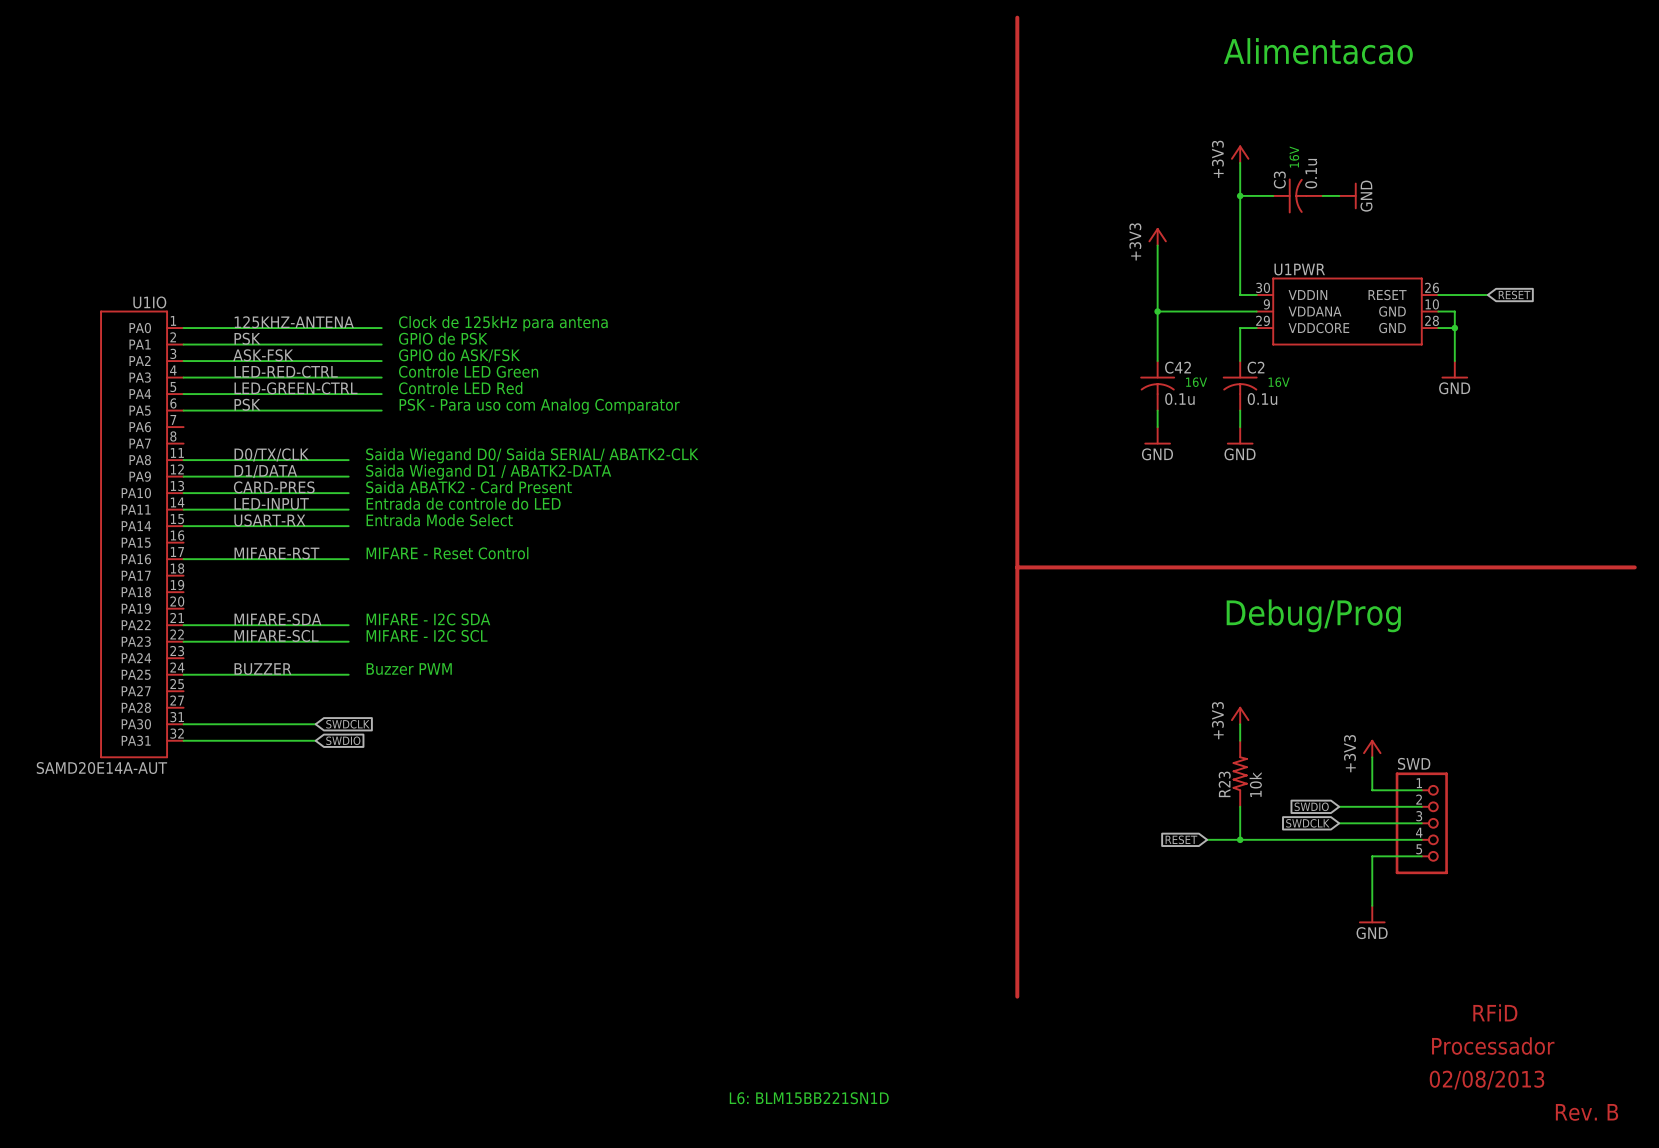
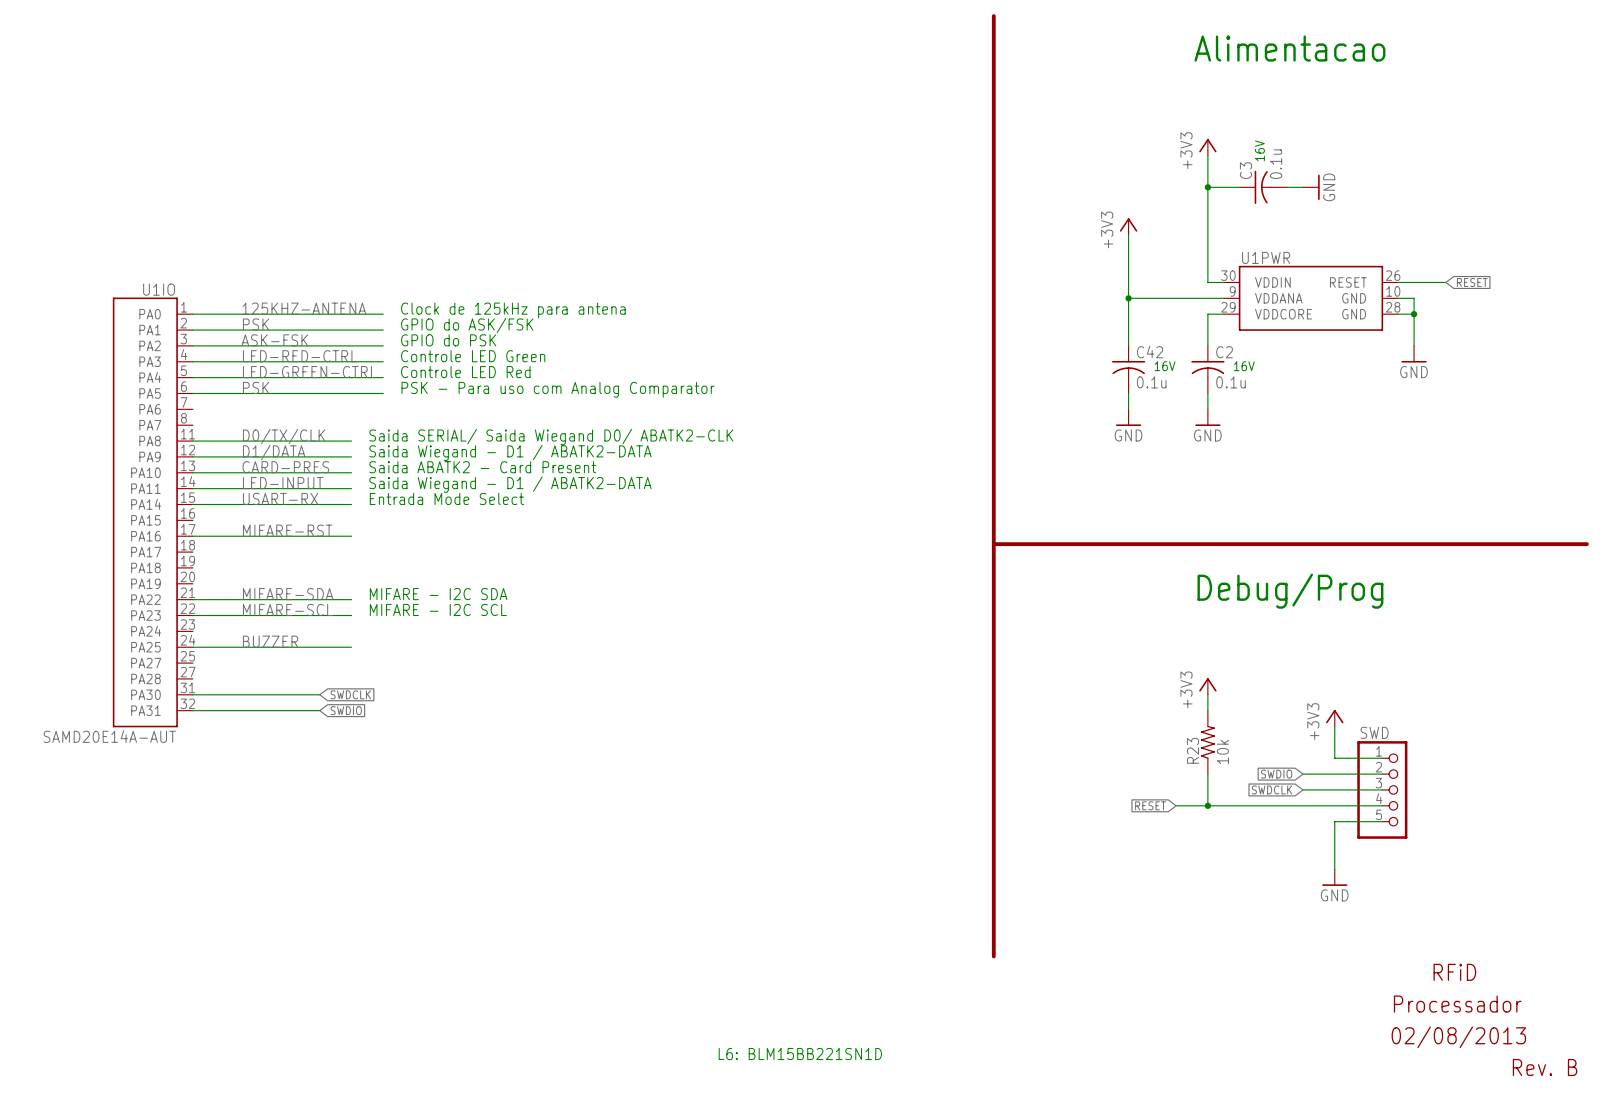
text: GPIO de PSK (443, 338) -> GPIO do ASK/FSK (467, 325)
text: GPIO do ASK/FSK (459, 355) -> GPIO do PSK (448, 340)
text: Saida Wiegand D0/ Saida SERIAL/ ABATK2-CLK (532, 455) -> Saida SERIAL/ Saida Wiegand D0/ ABATK2-CLK (551, 437)
text: Saida Wiegand D1 / ABATK2-DATA (488, 472) -> Saida Wiegand - D1 / ABATK2-DATA (510, 452)
text: Entrada de controle do LED (463, 503) -> Saida Wiegand - D1 / ABATK2-DATA (510, 484)
text: MIFARE - Reset Control (447, 553) -> none
text: Buzzer PWM (409, 669) -> none

